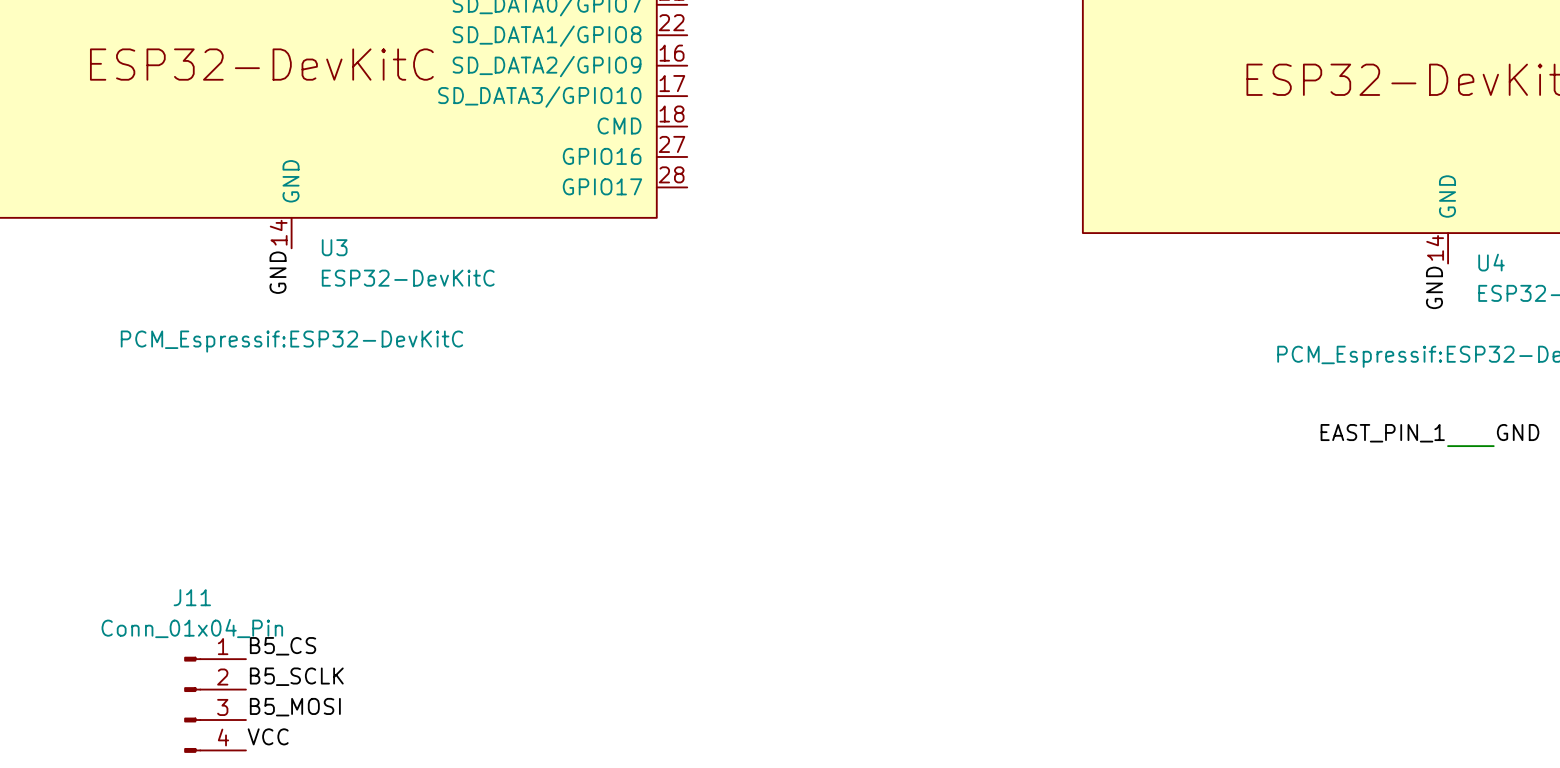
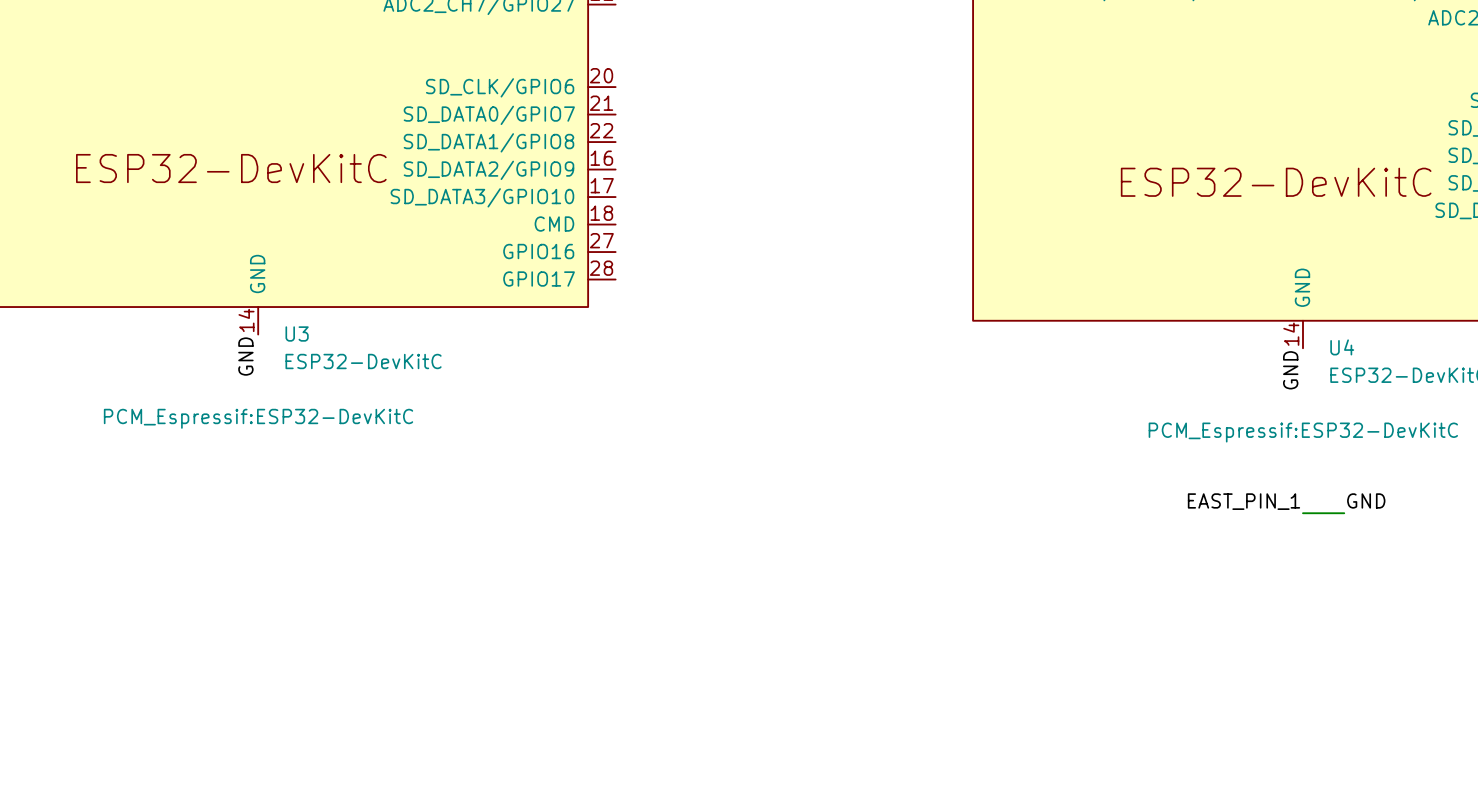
label: B5_CS (283, 646) -> none
label: B5_SCLK (296, 676) -> none
J11: Conn_01x04_Pin (215, 704) -> none
label: B5_MOSI (295, 707) -> none
label: VCC (268, 736) -> none

